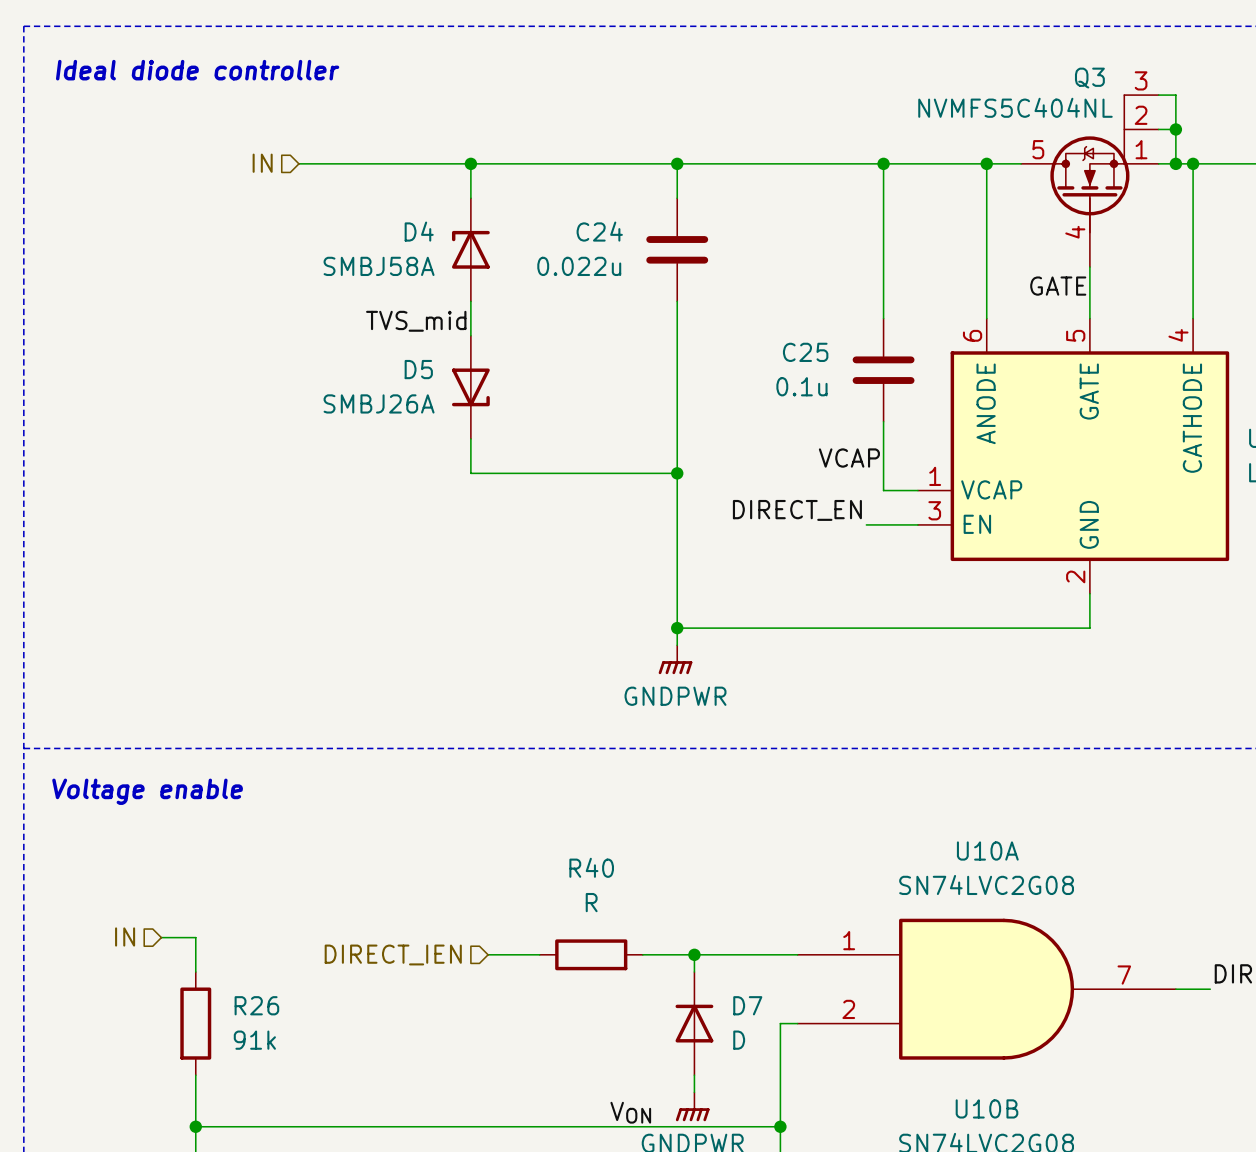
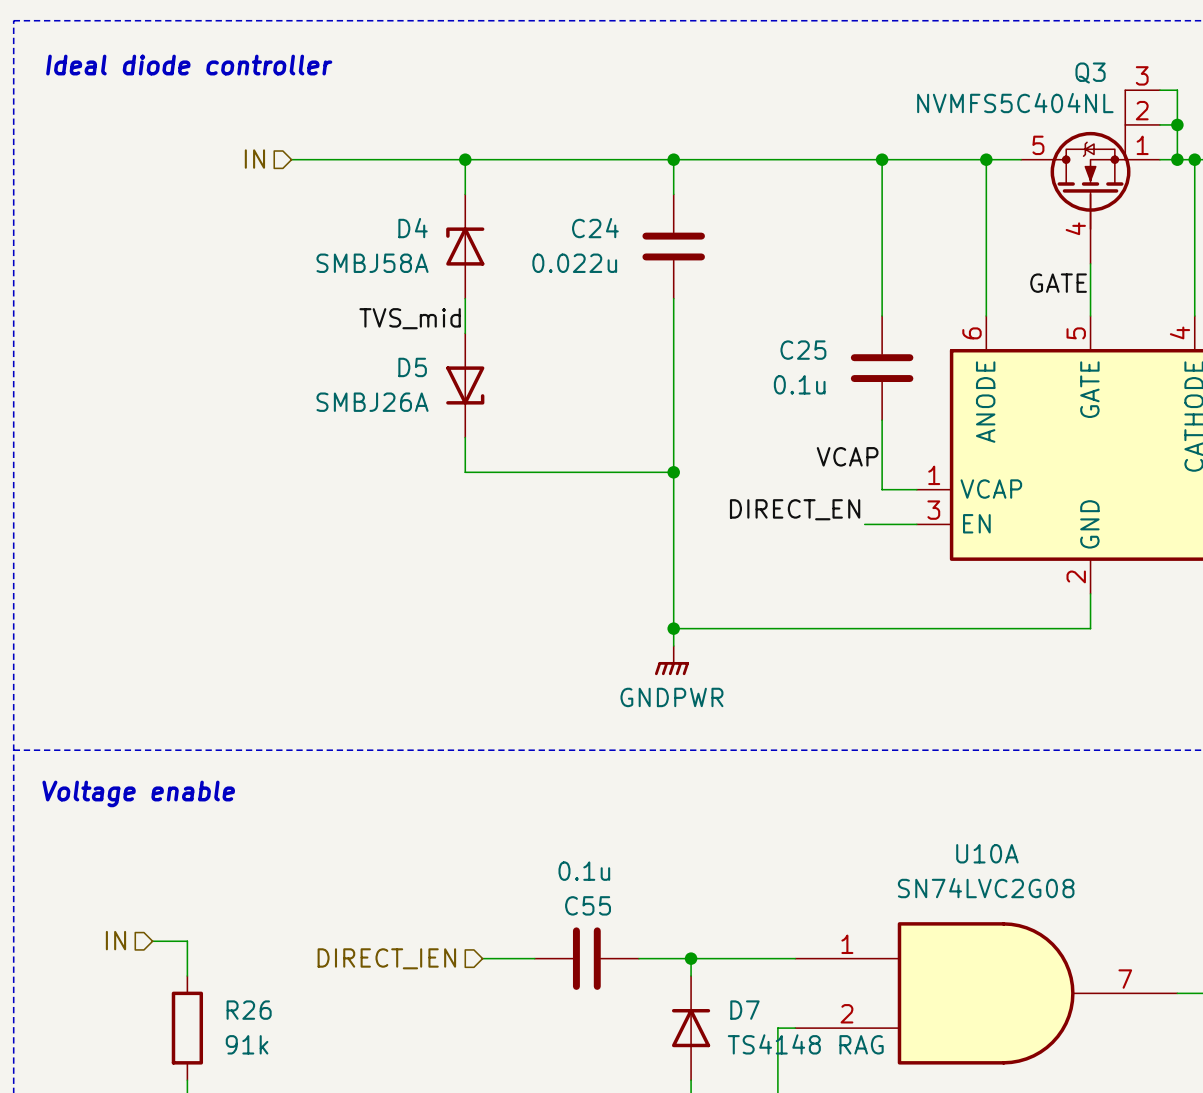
R40: R (591, 954) -> none
C55: none -> 0.1u (586, 958)
D7 value: D (739, 1040) -> TS4148 RAG (805, 1044)

